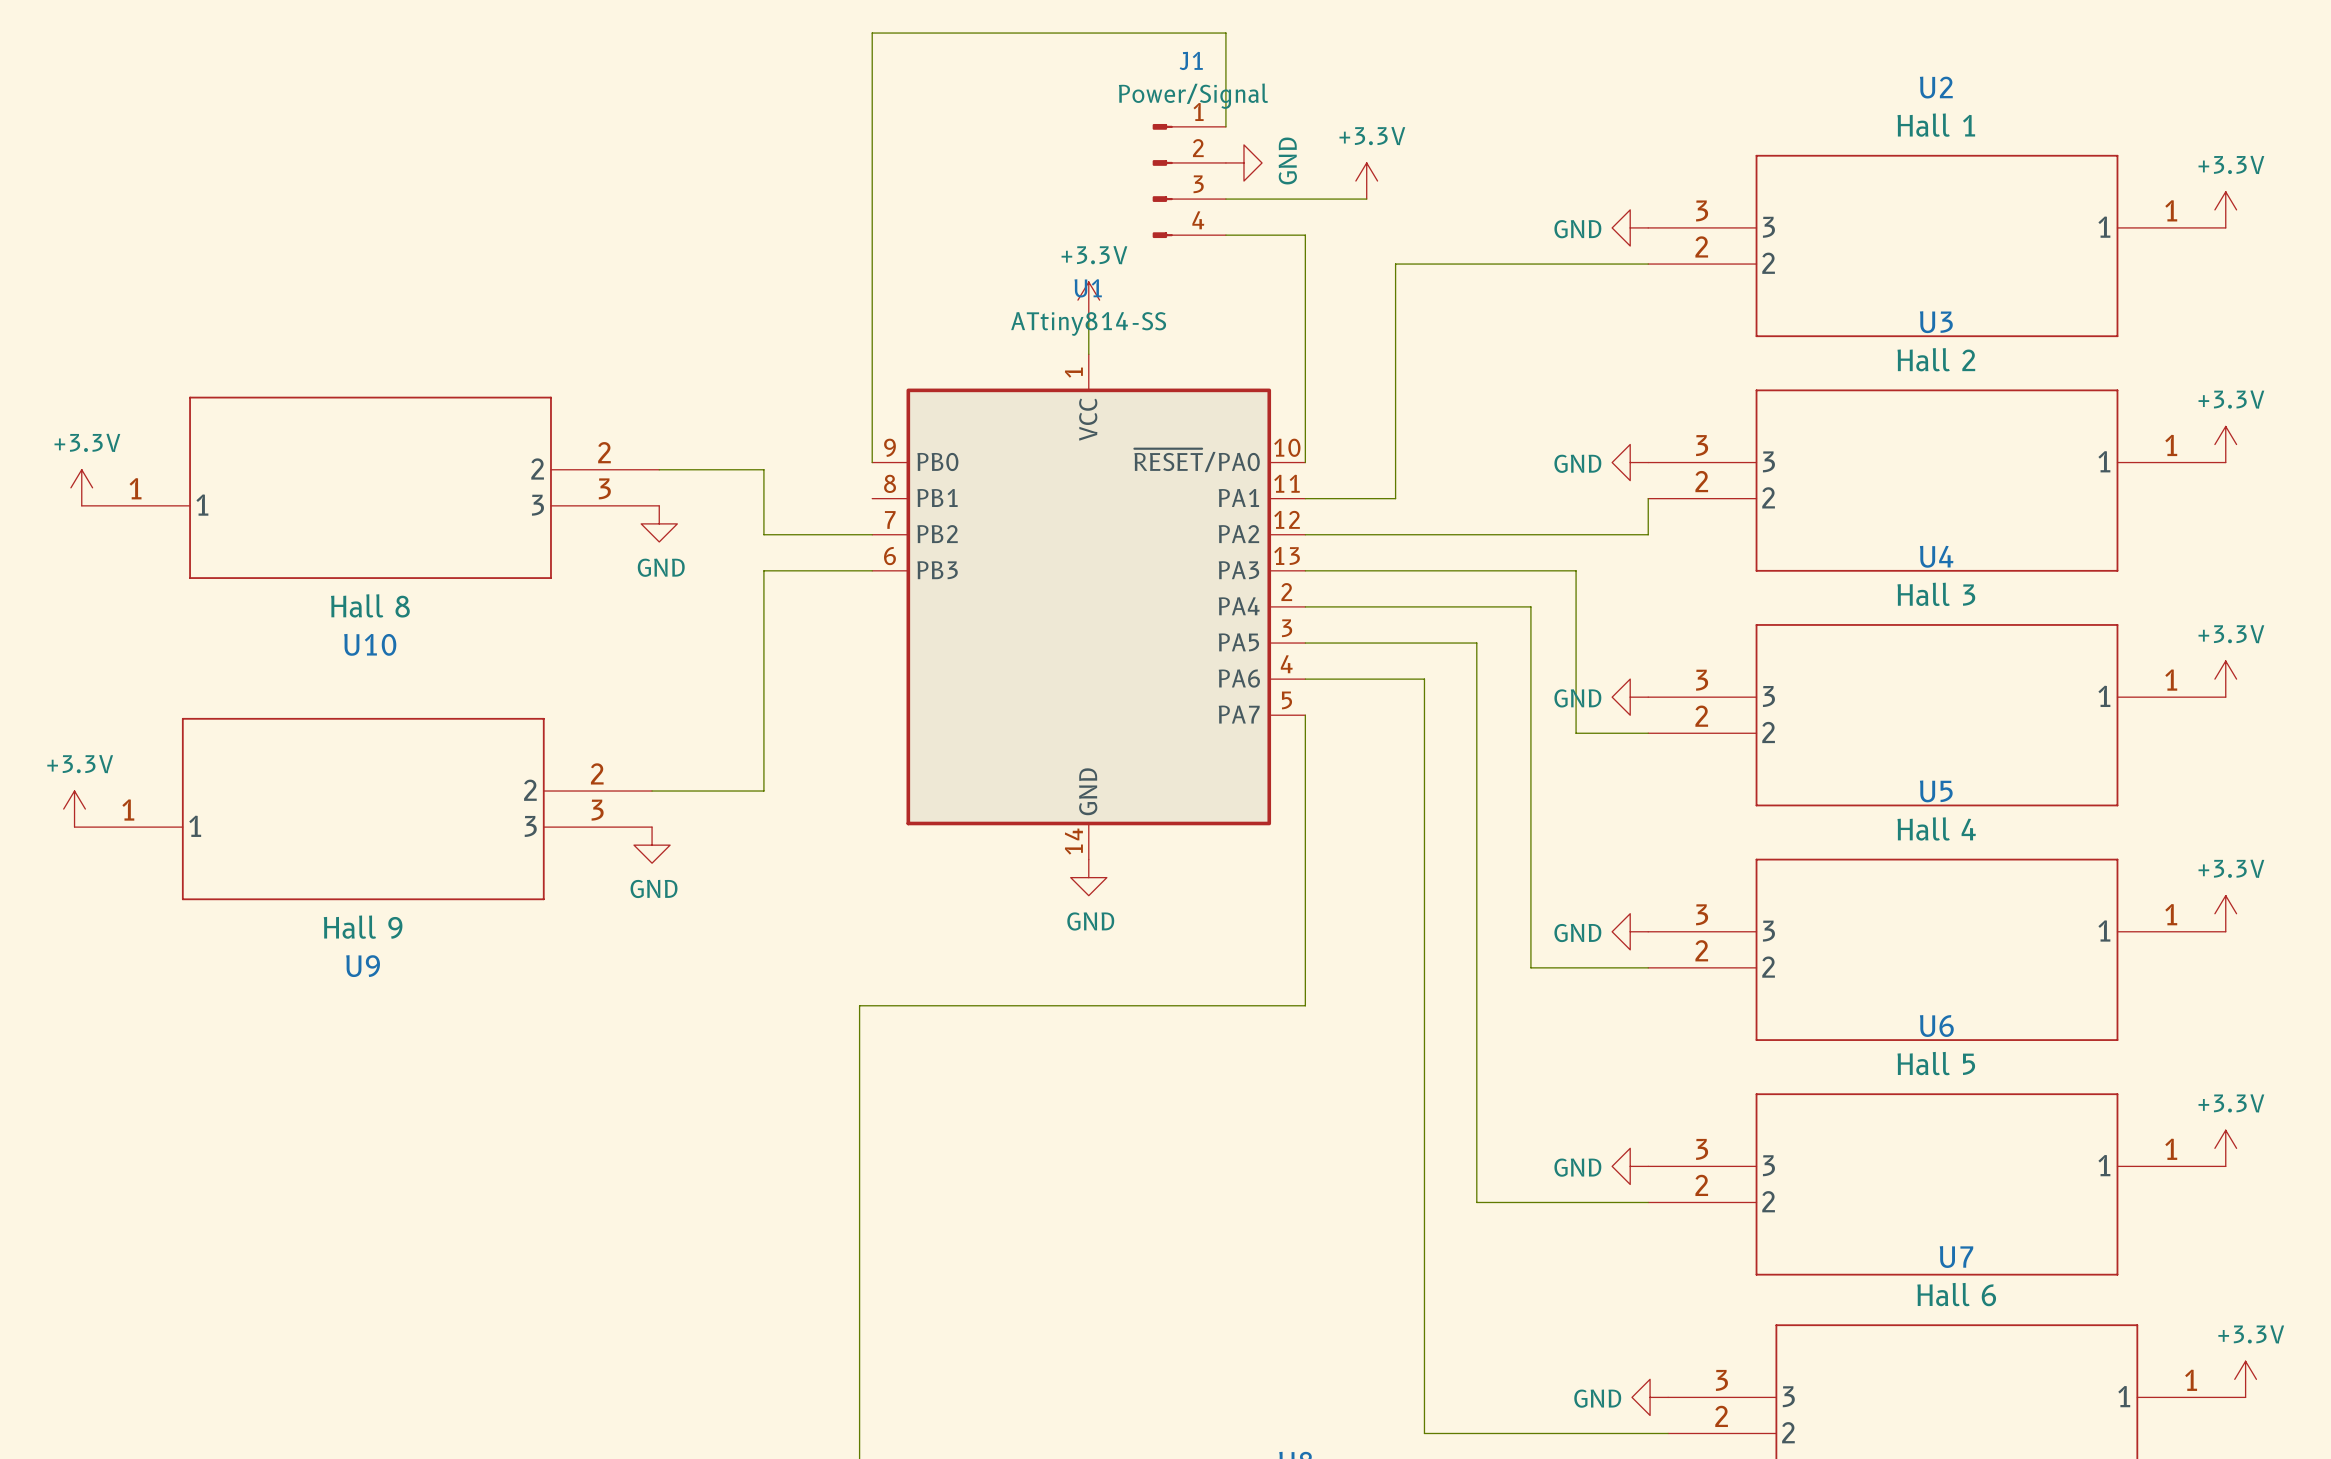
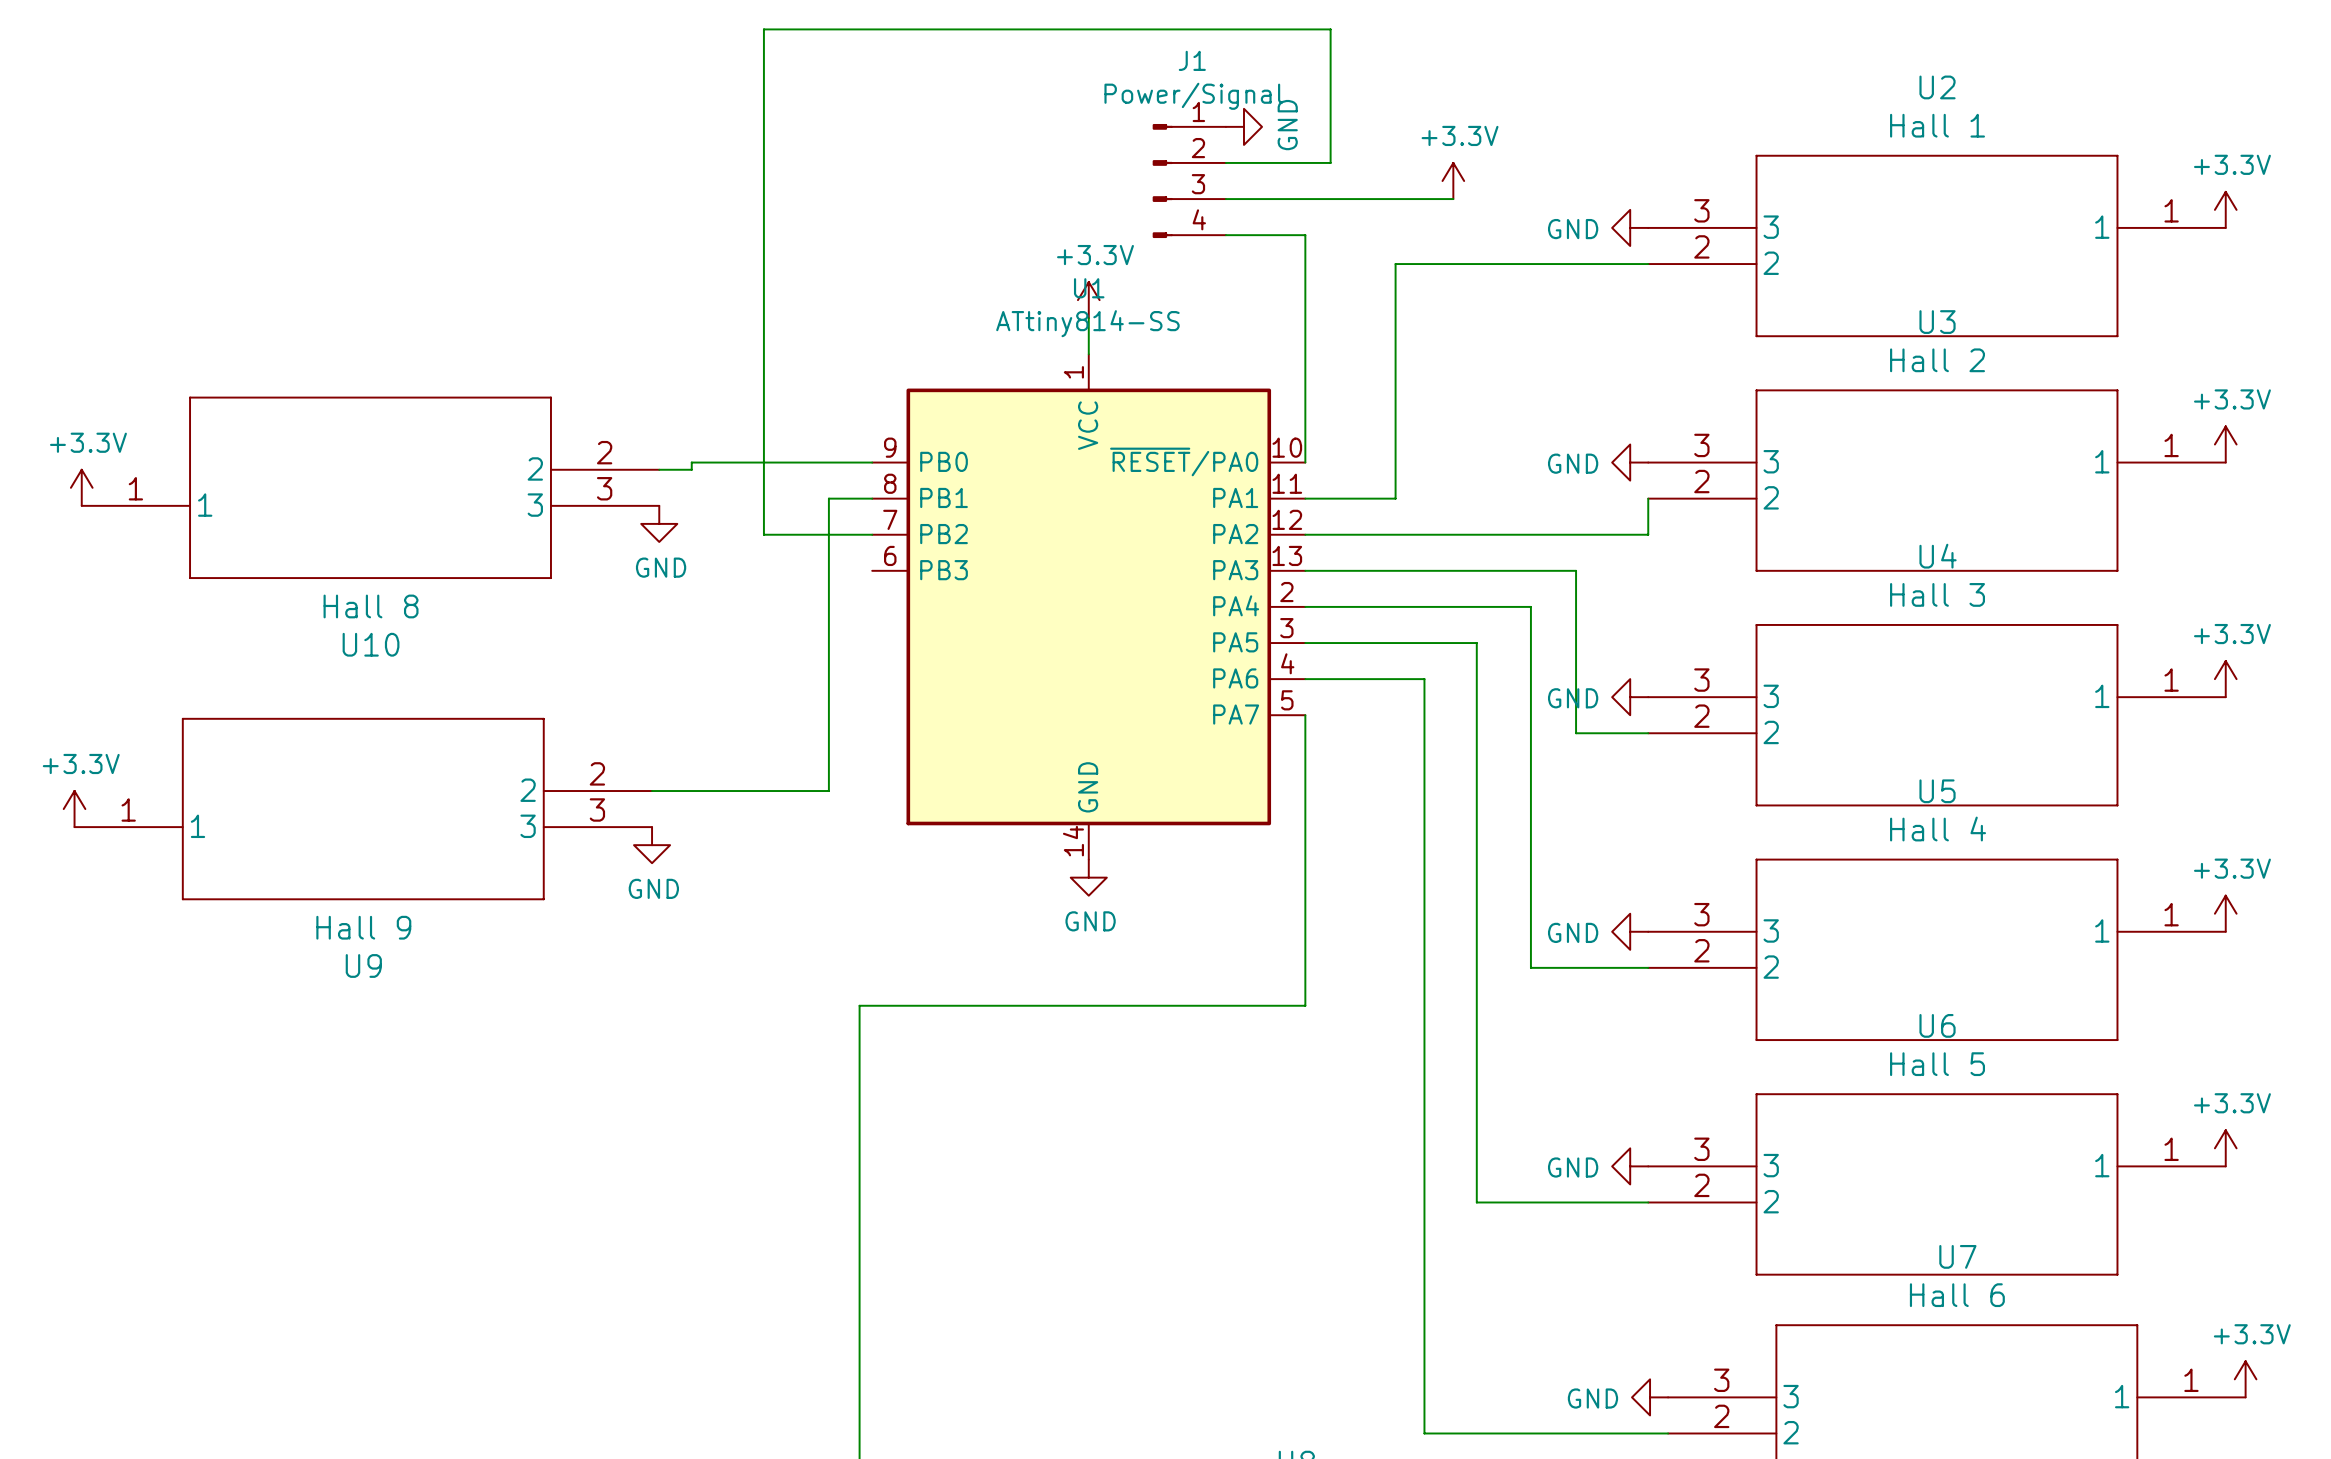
wire: (1225, 126) (1225, 33) (872, 33) (872, 462) -> none
wire: none -> (1225, 162) (1330, 162) (1330, 29) (763, 29) (763, 469)
power symbol position: GND (1243, 162) -> GND (1243, 126)
power symbol position: +3.3V (1366, 181) -> +3.3V (1453, 181)
wire: none -> (1366, 199) (1453, 199)
wire: (691, 469) (763, 469) -> (691, 469) (691, 462) (872, 462)
wire: (872, 570) (763, 570) (763, 791) -> (872, 498) (828, 498) (828, 791) (763, 791)

